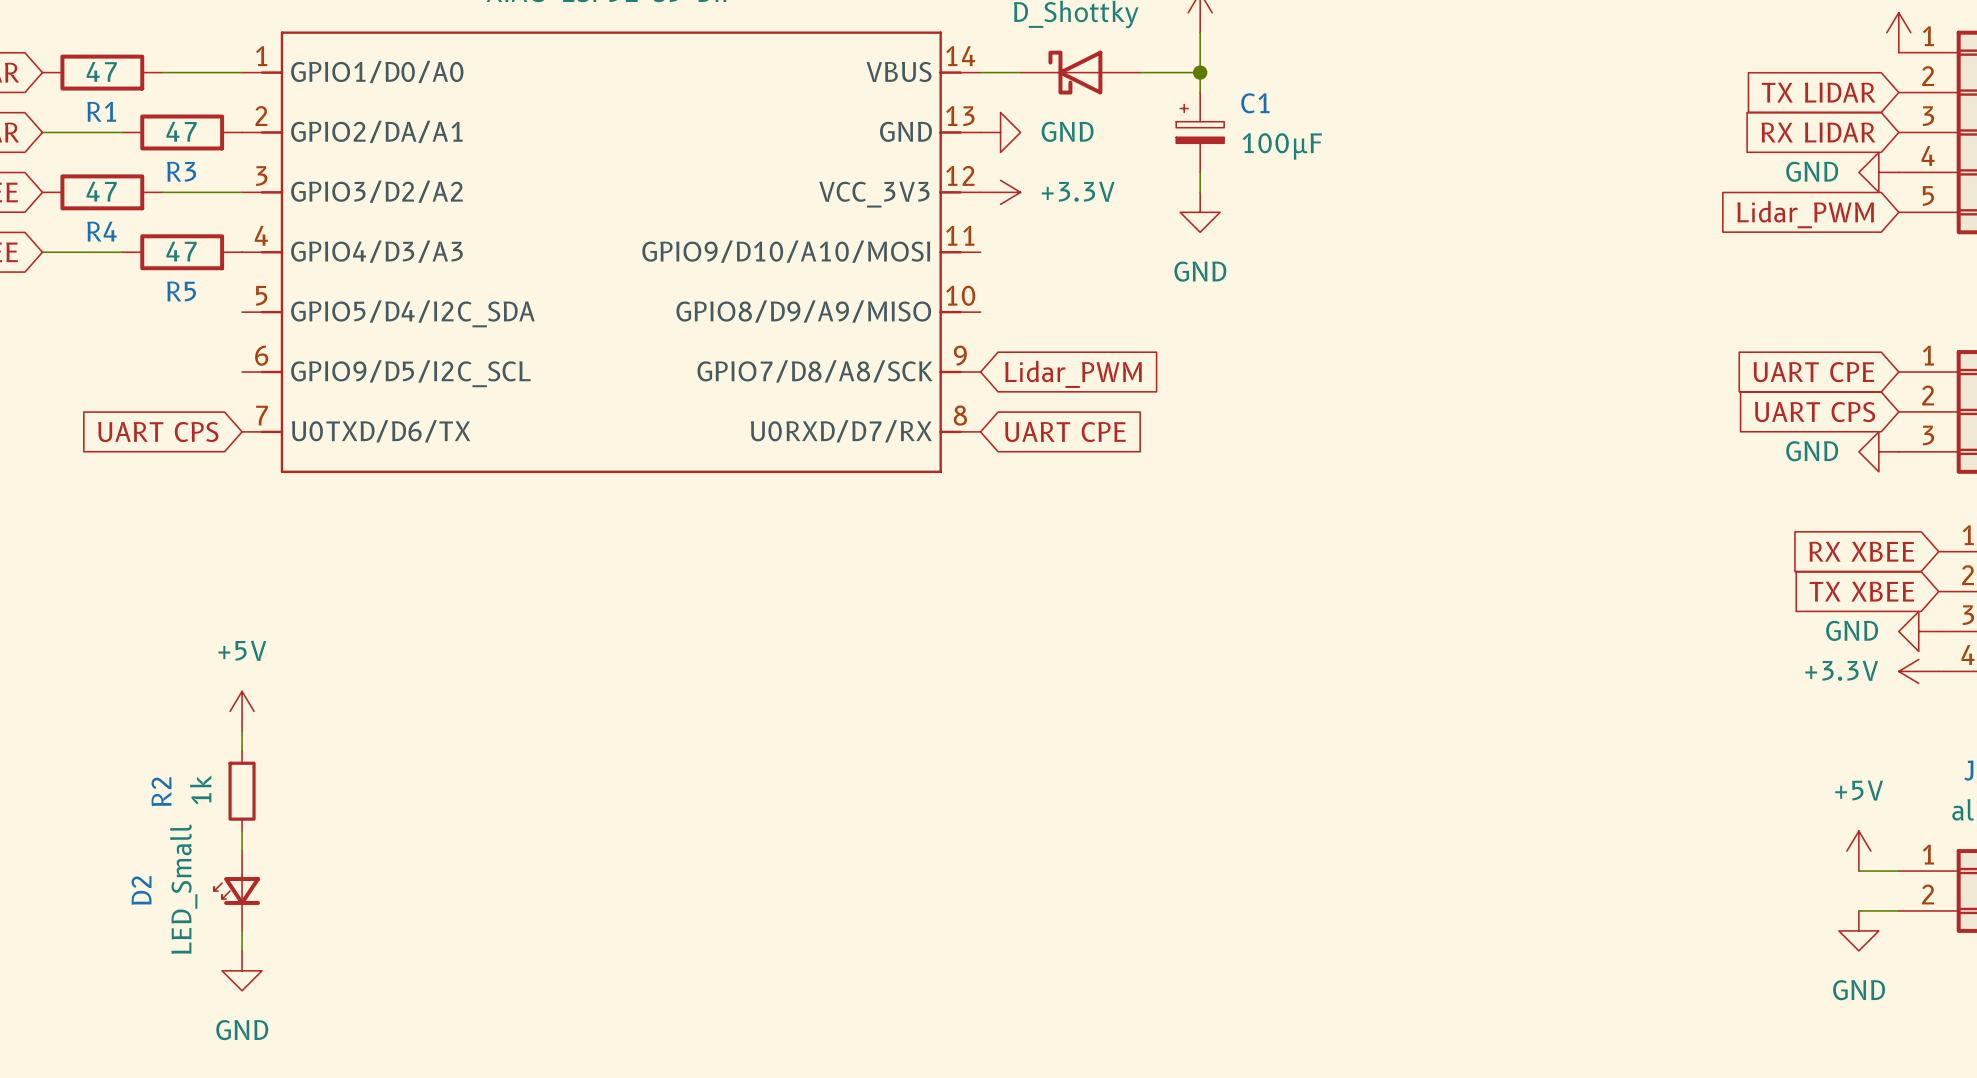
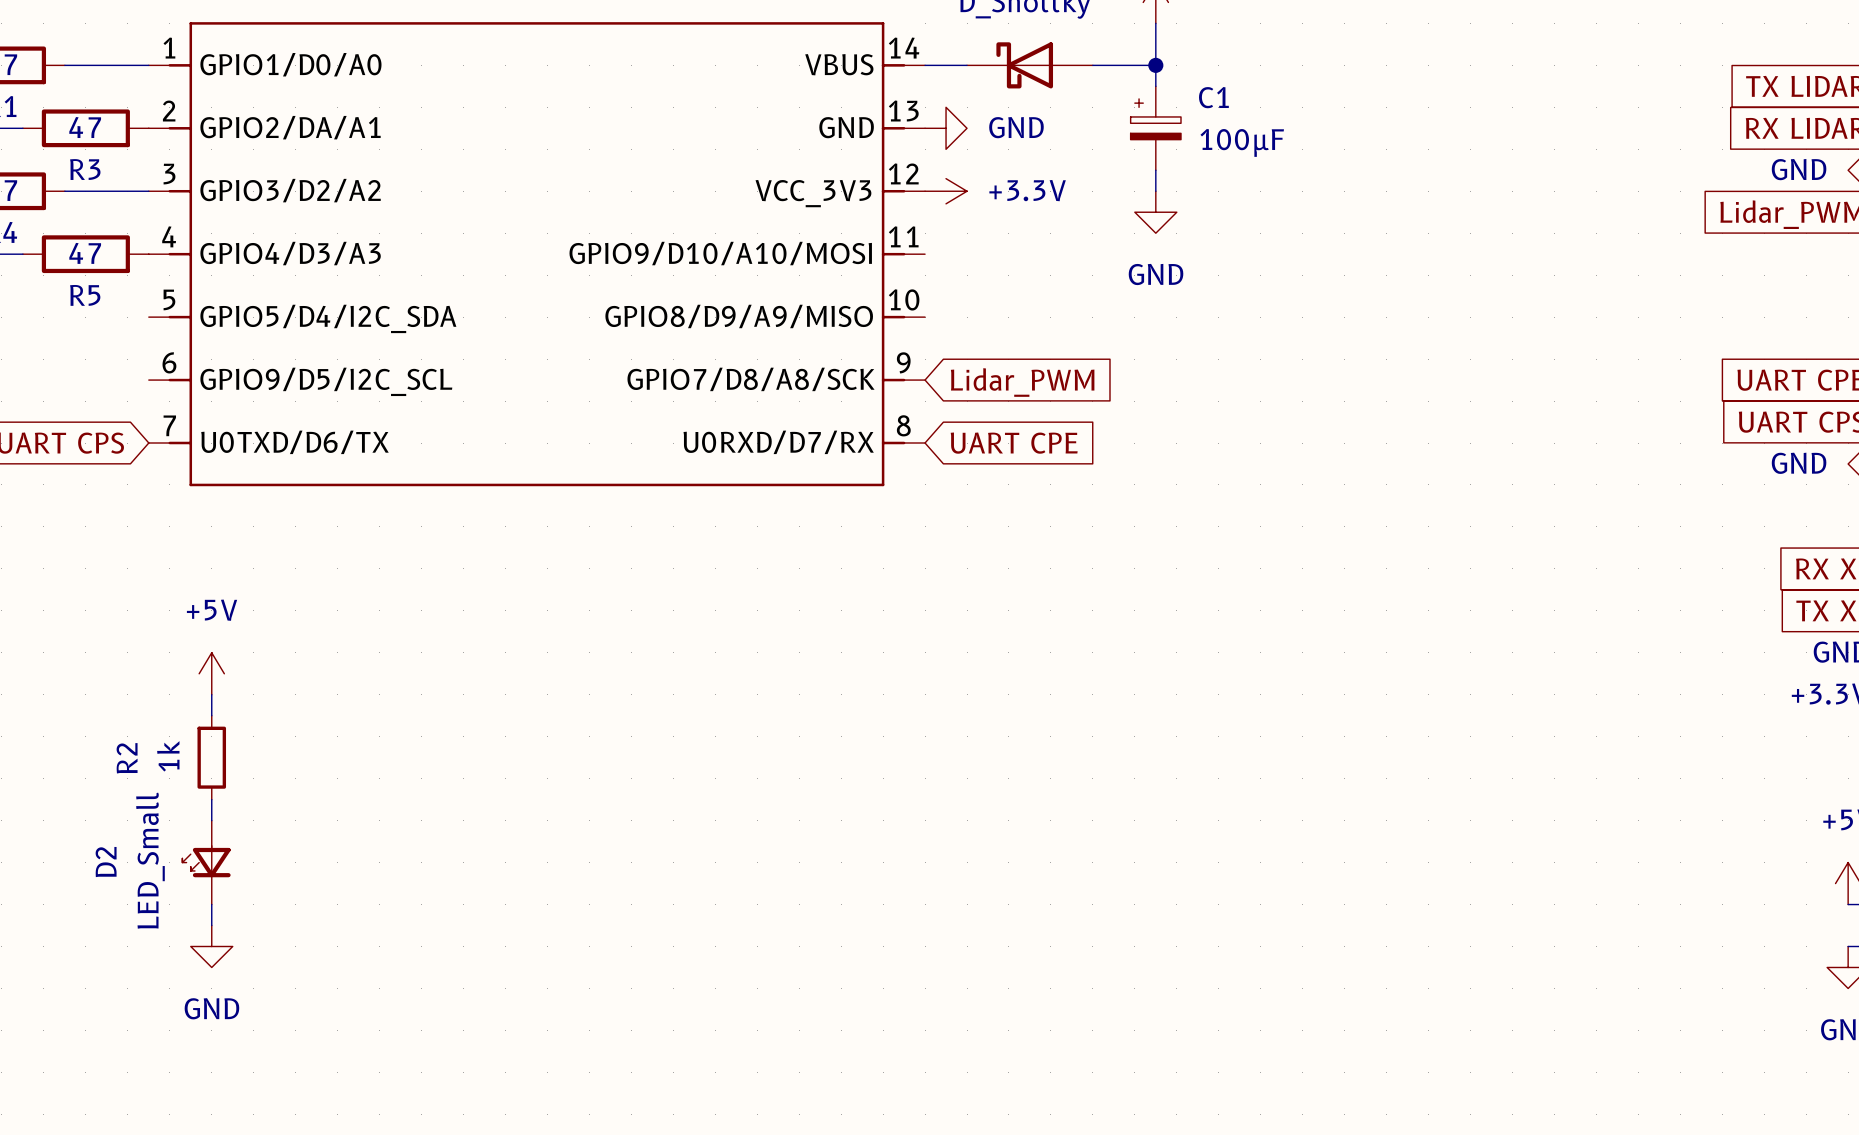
power symbol position: +5V (242, 711) -> +5V (211, 673)
wire: (242, 731) (242, 751) -> (211, 694) (211, 715)
R2 position: (242, 791) -> (211, 757)
wire: (242, 831) (242, 851) -> (211, 799) (211, 820)
D2 position: (237, 890) -> (206, 862)
wire: (242, 930) (242, 950) -> (211, 904) (211, 925)
power symbol position: GND (242, 970) -> GND (211, 946)

